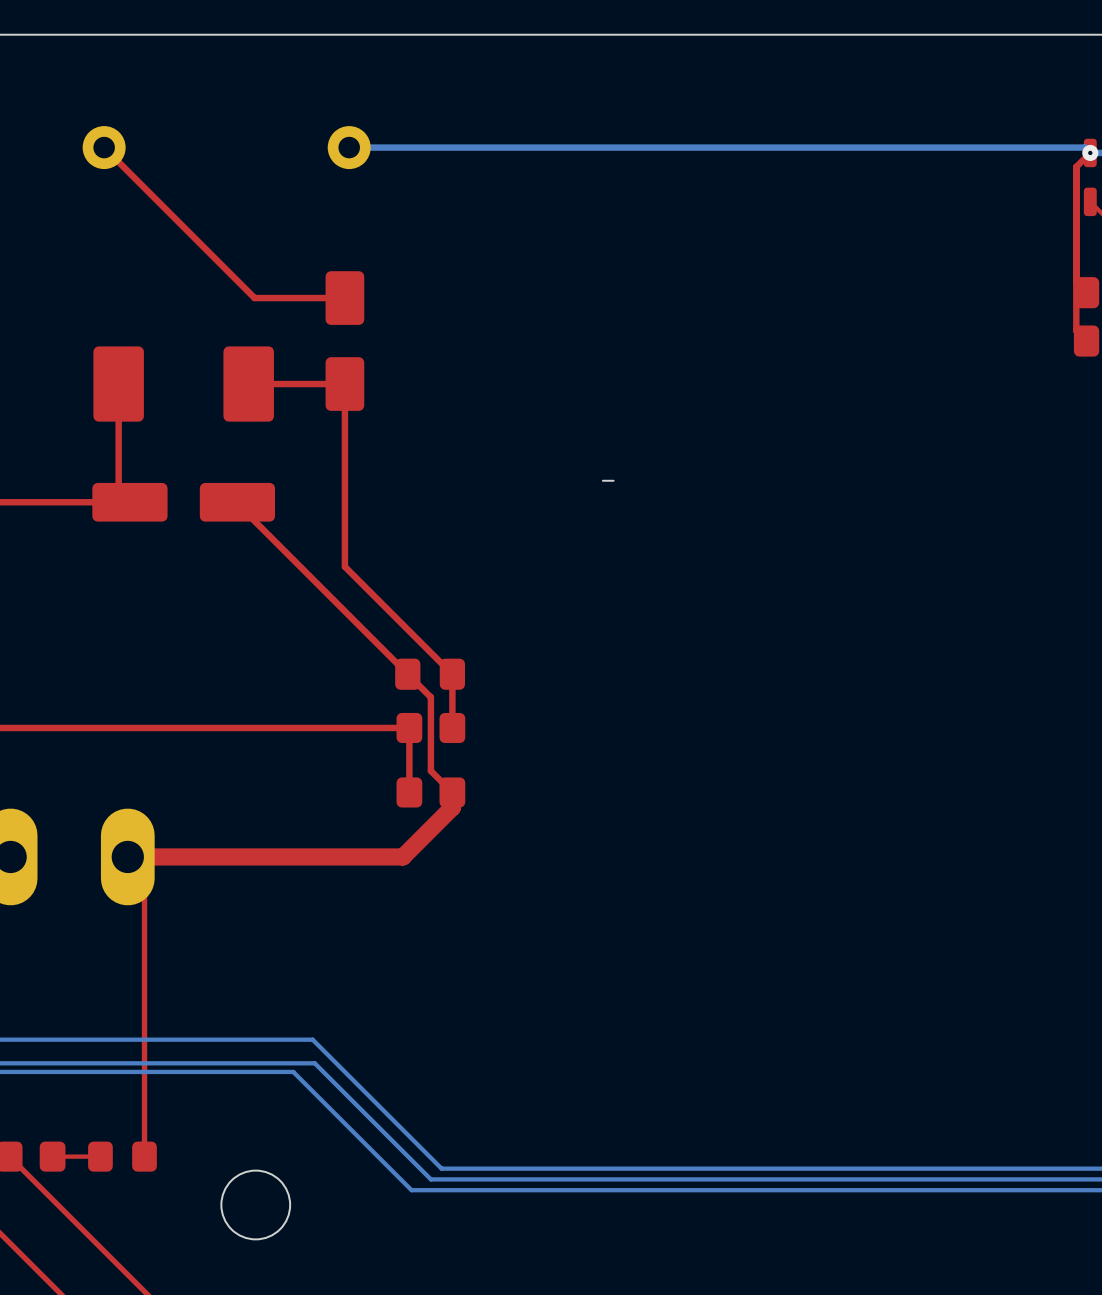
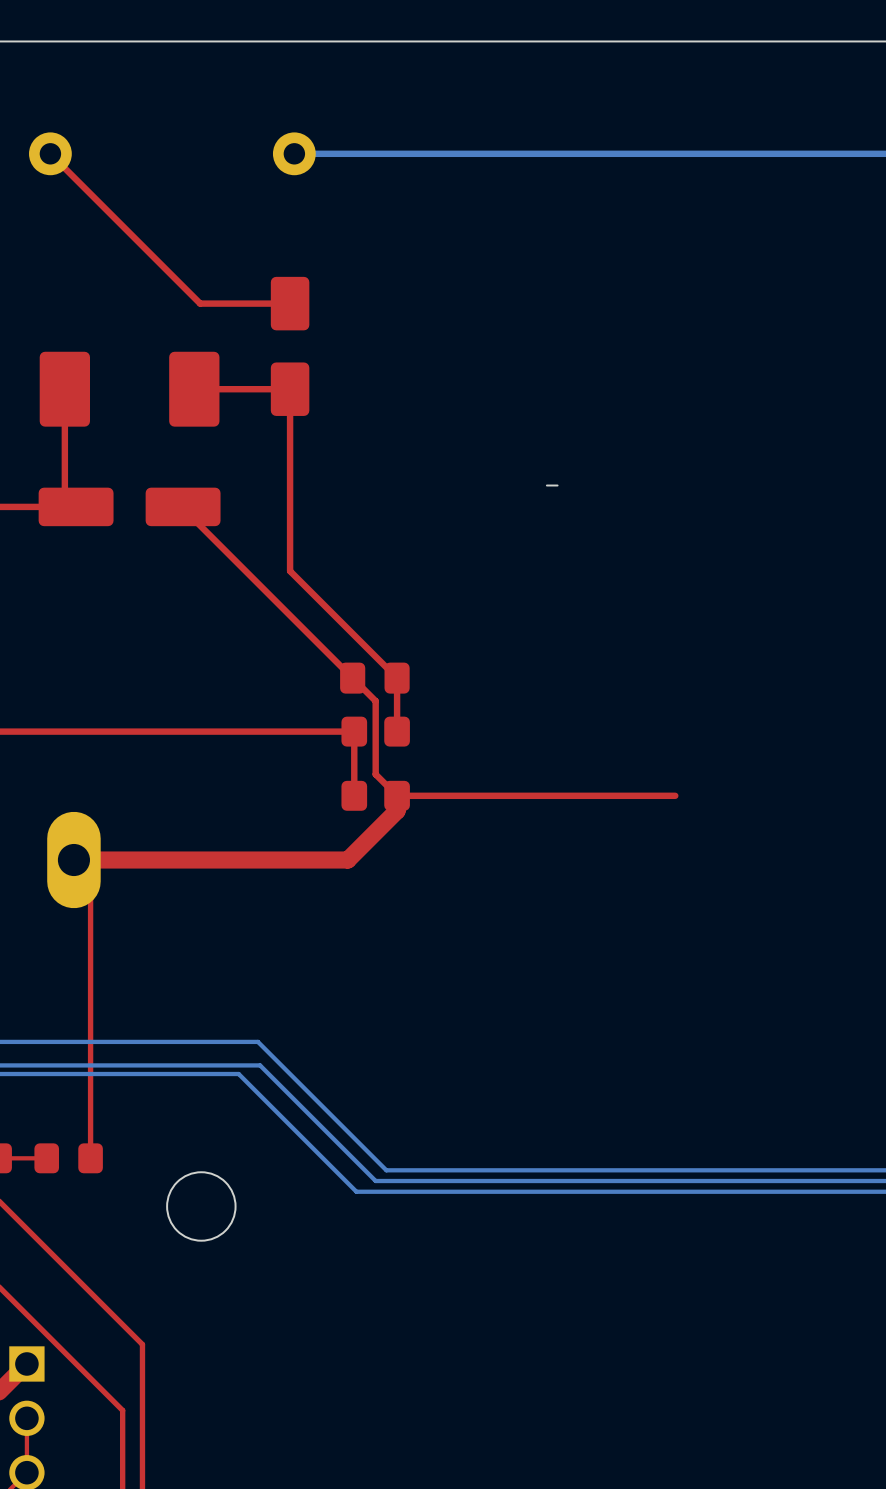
top track: none -> (675, 795) (397, 795)

